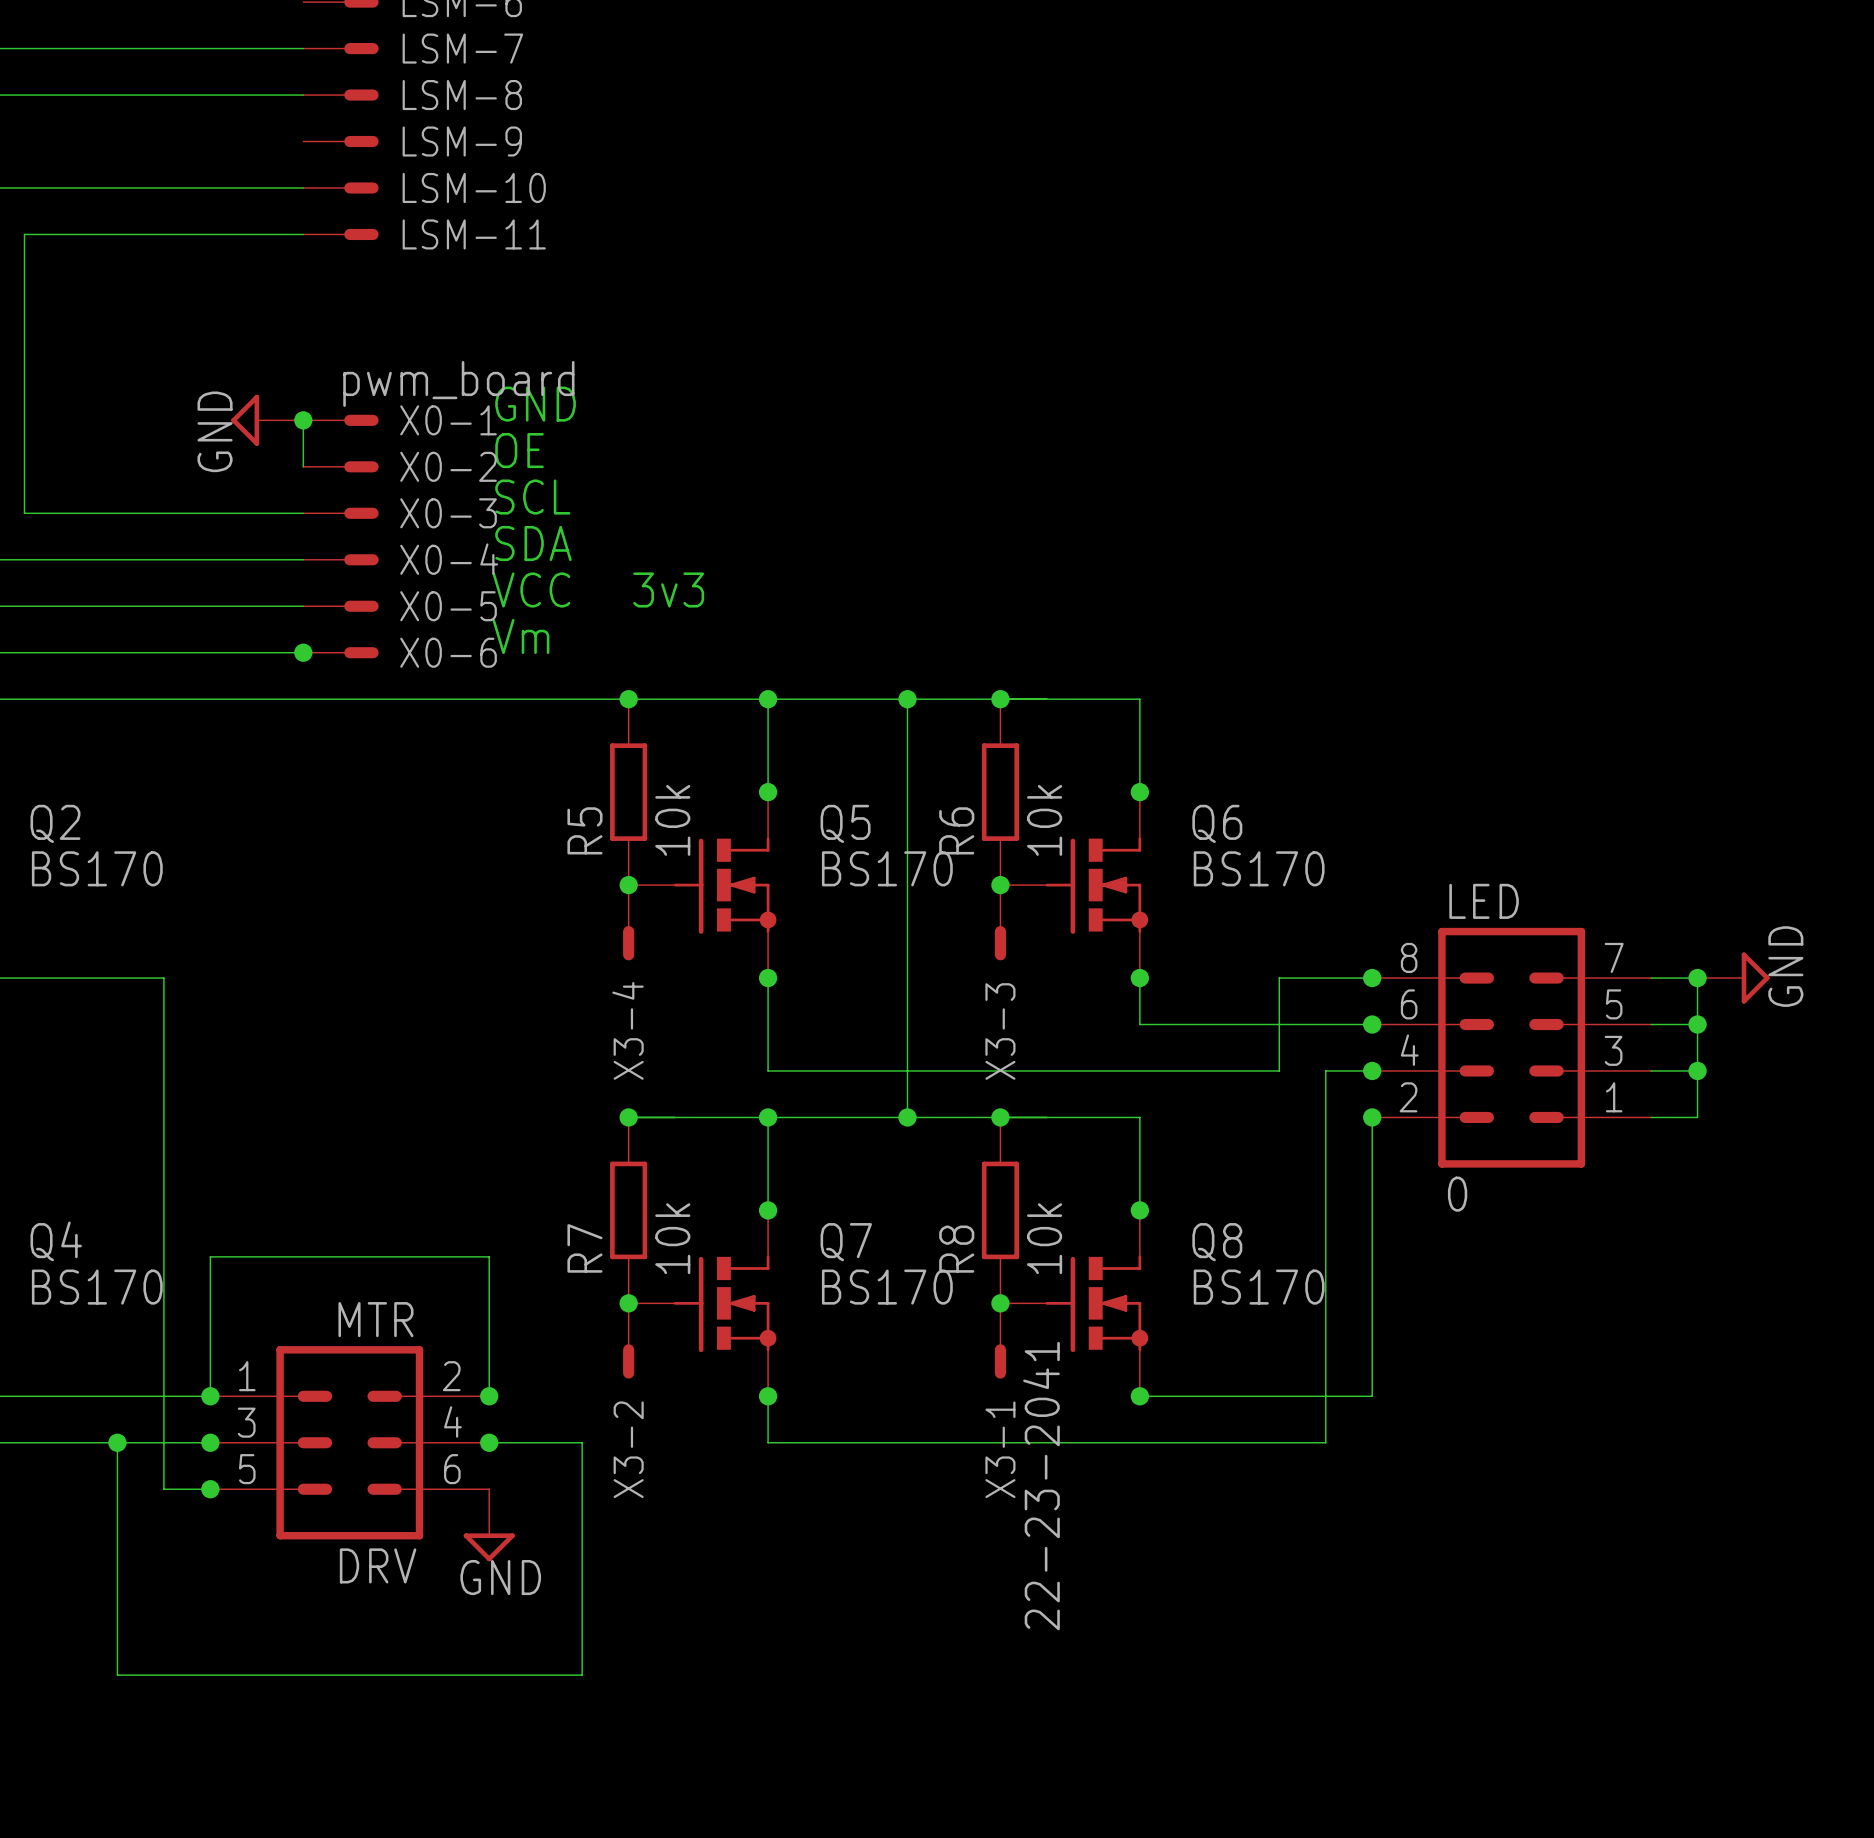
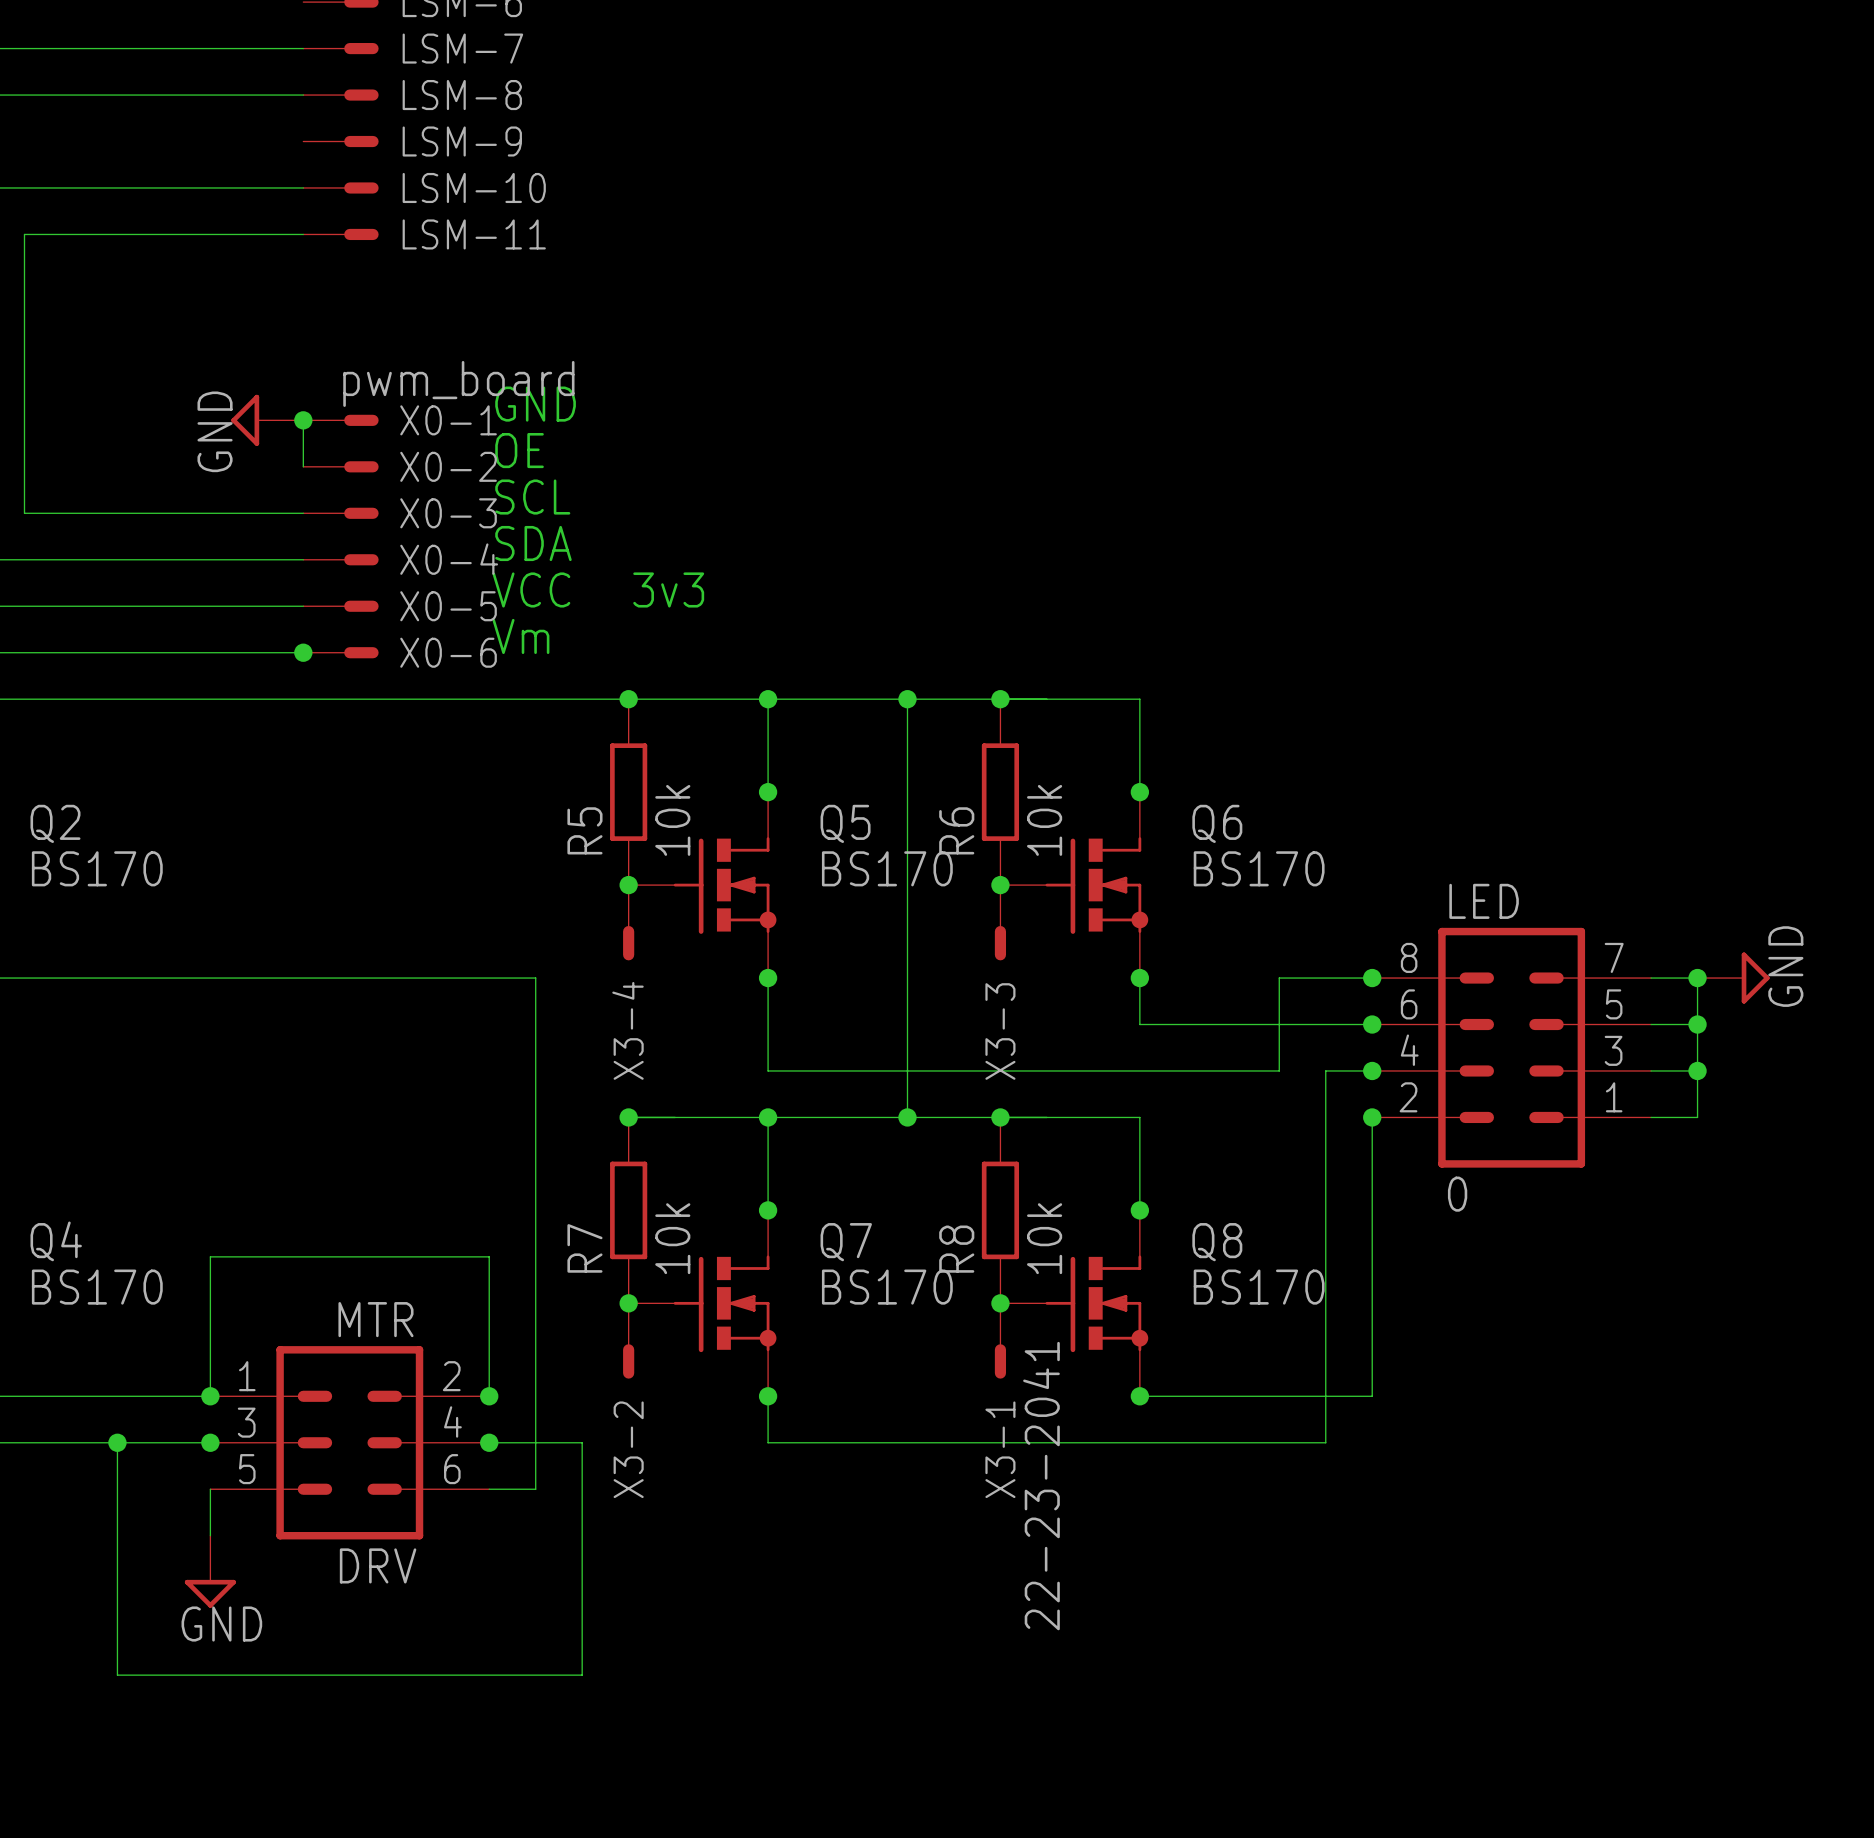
wire: (163, 978) (163, 1489) (210, 1489) -> (163, 978) (535, 978) (535, 1489) (489, 1489)
wire: none -> (210, 1489) (210, 1535)
junction: (210, 1489) -> none
power symbol position: GND (489, 1525) -> GND (210, 1571)

